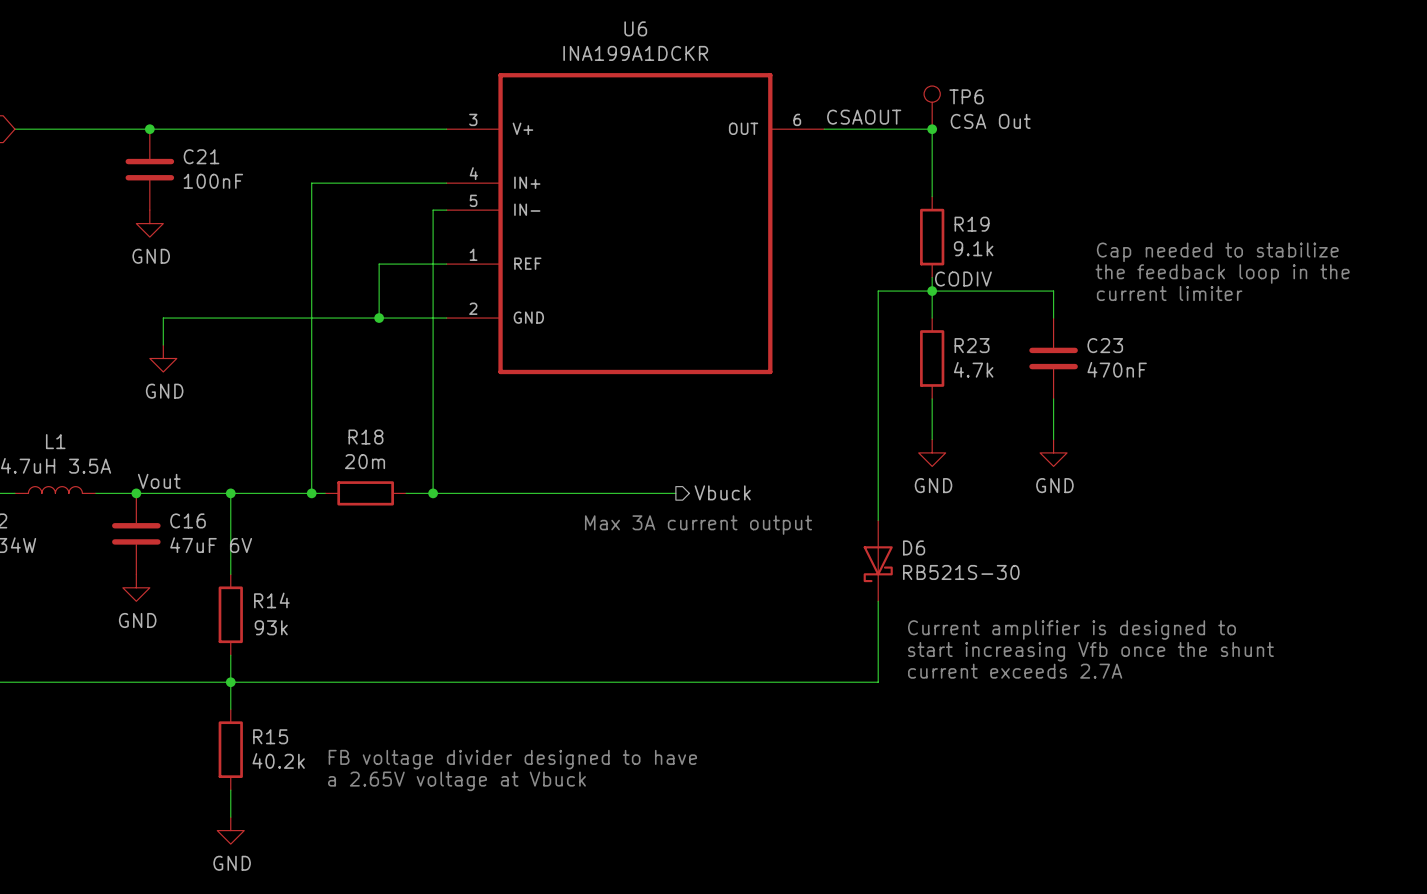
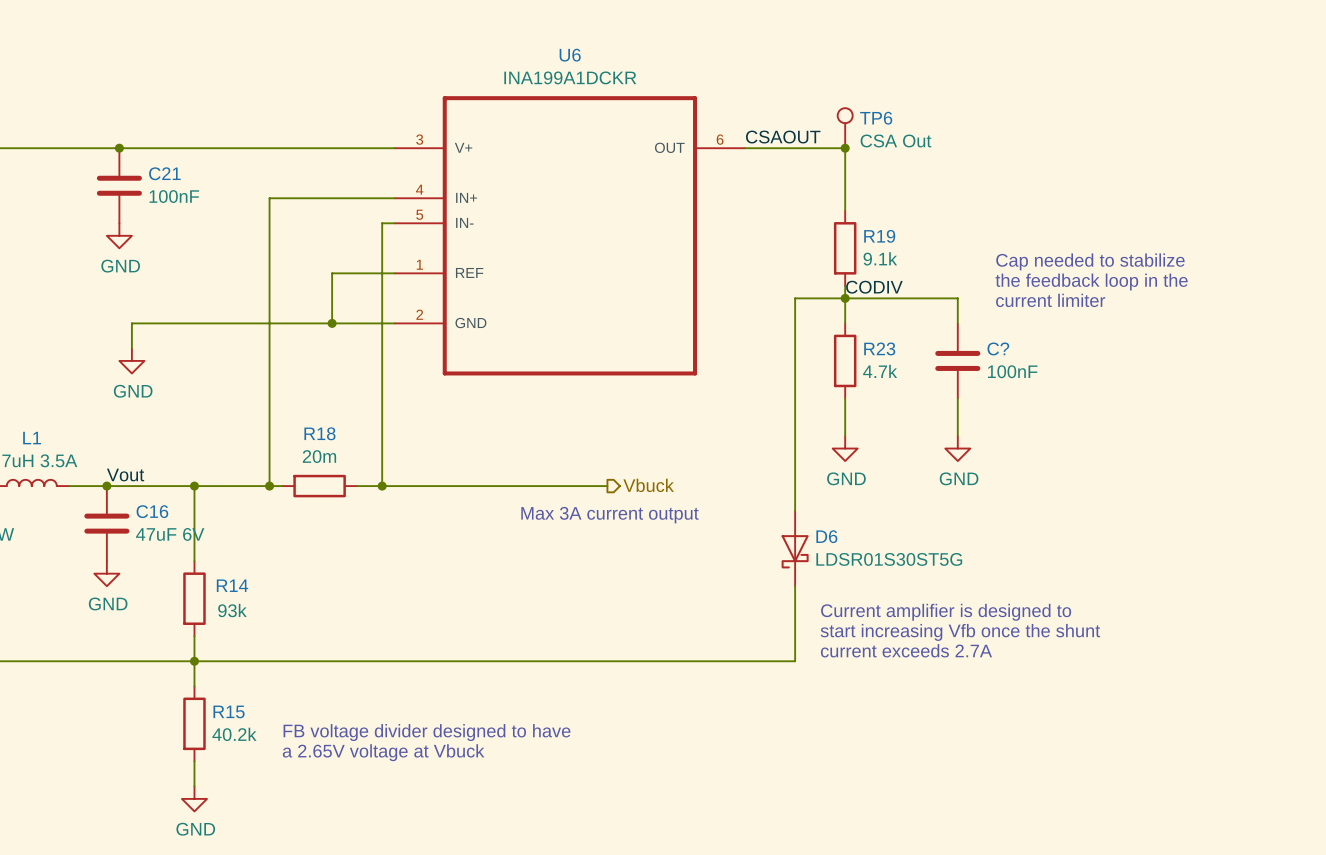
C23 name: C23 (1105, 345) -> C? (998, 348)
C23 value: 470nF (1117, 369) -> 100nF (1012, 371)
D6 value: RB521S-30 (961, 572) -> LDSR01S30ST5G (889, 559)

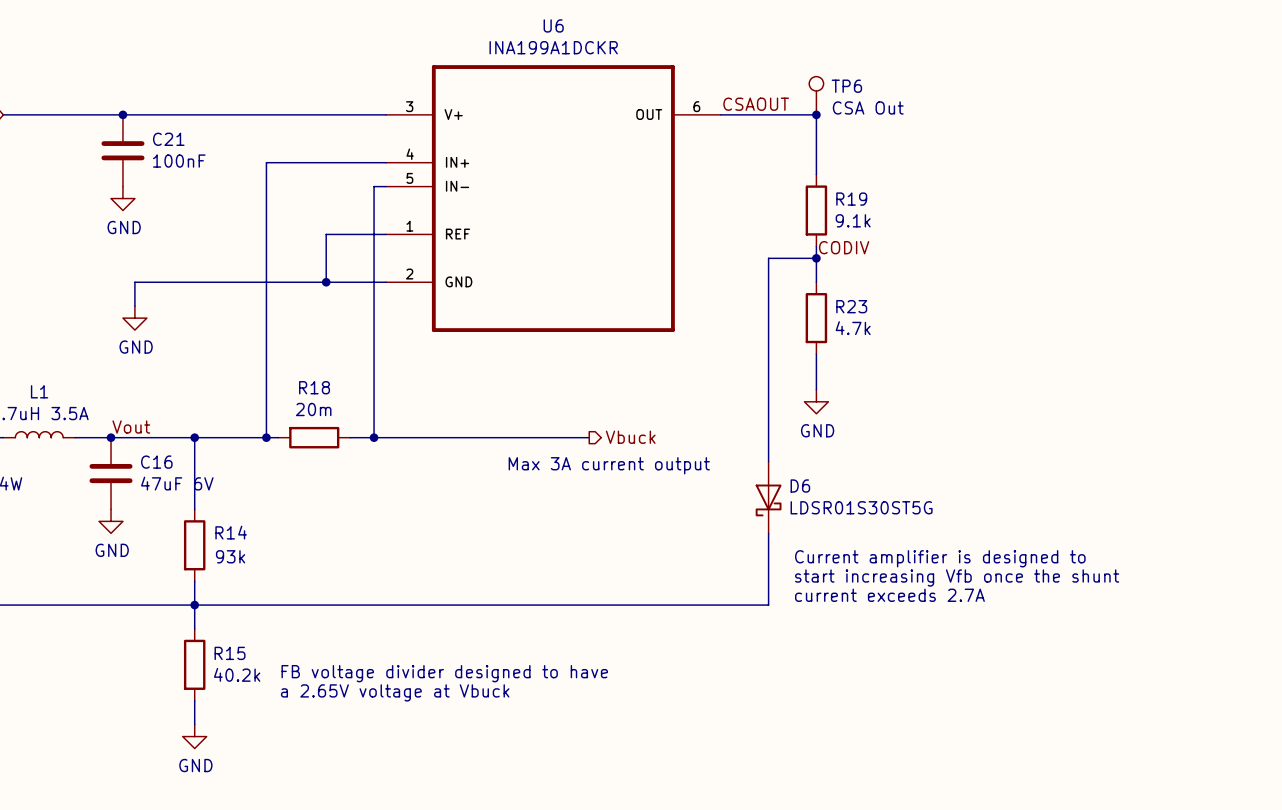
text: Cap needed to stabilize (1090, 261) -> none
text: the feedback loop in the (1091, 282) -> none
wire: (845, 298) (957, 298) (957, 323) -> none
text: current limiter (1050, 300) -> none
C?: 100nF (957, 360) -> none
wire: (957, 398) (957, 436) -> none
power symbol: GND (957, 448) -> none

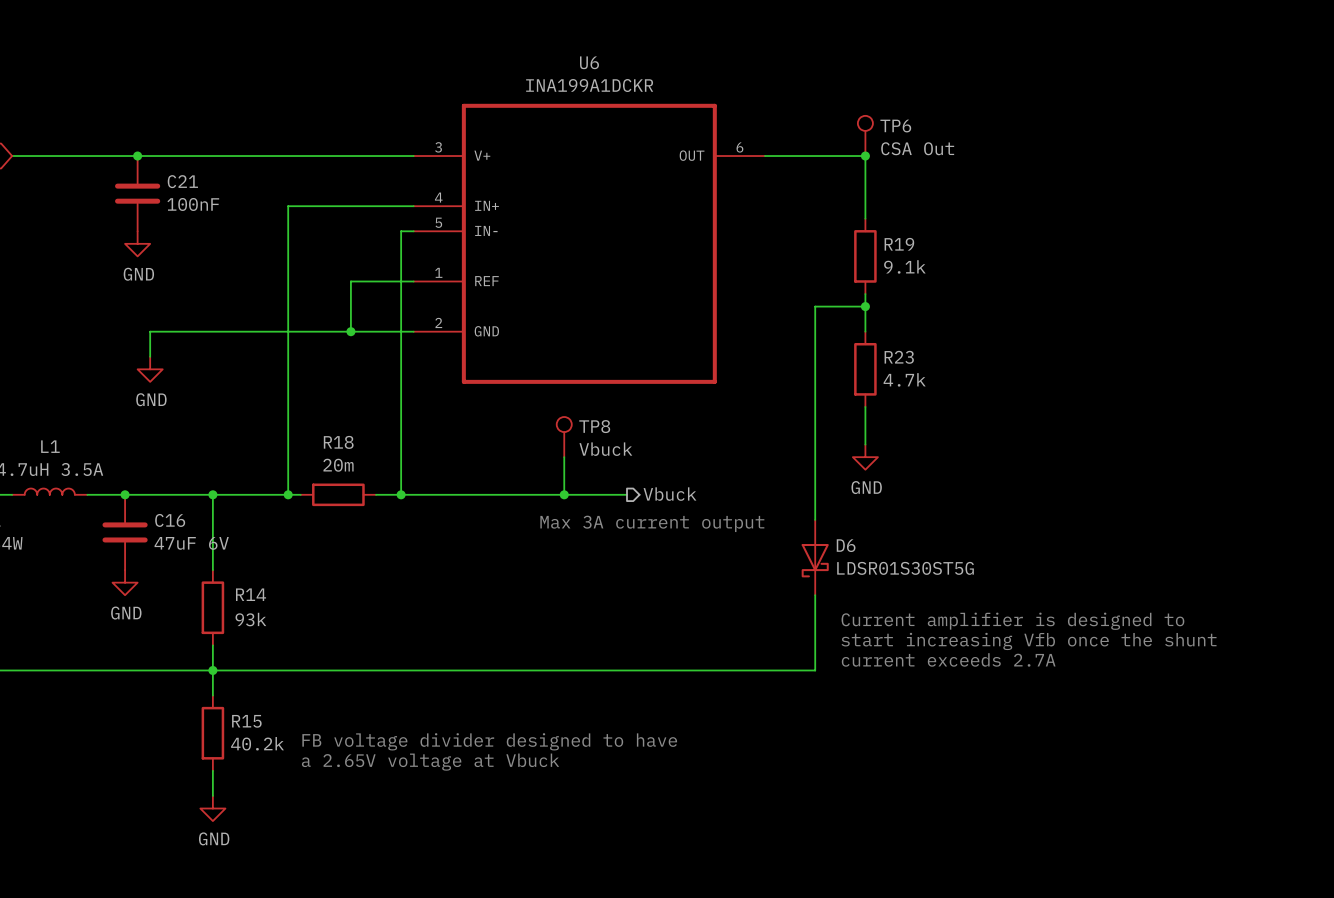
label: CSAOUT (756, 104) -> none
label: CODIV (844, 247) -> none
TP8: none -> Vbuck (564, 437)
wire: none -> (564, 457) (564, 494)
label: Vout (131, 427) -> none
junction: none -> (564, 494)

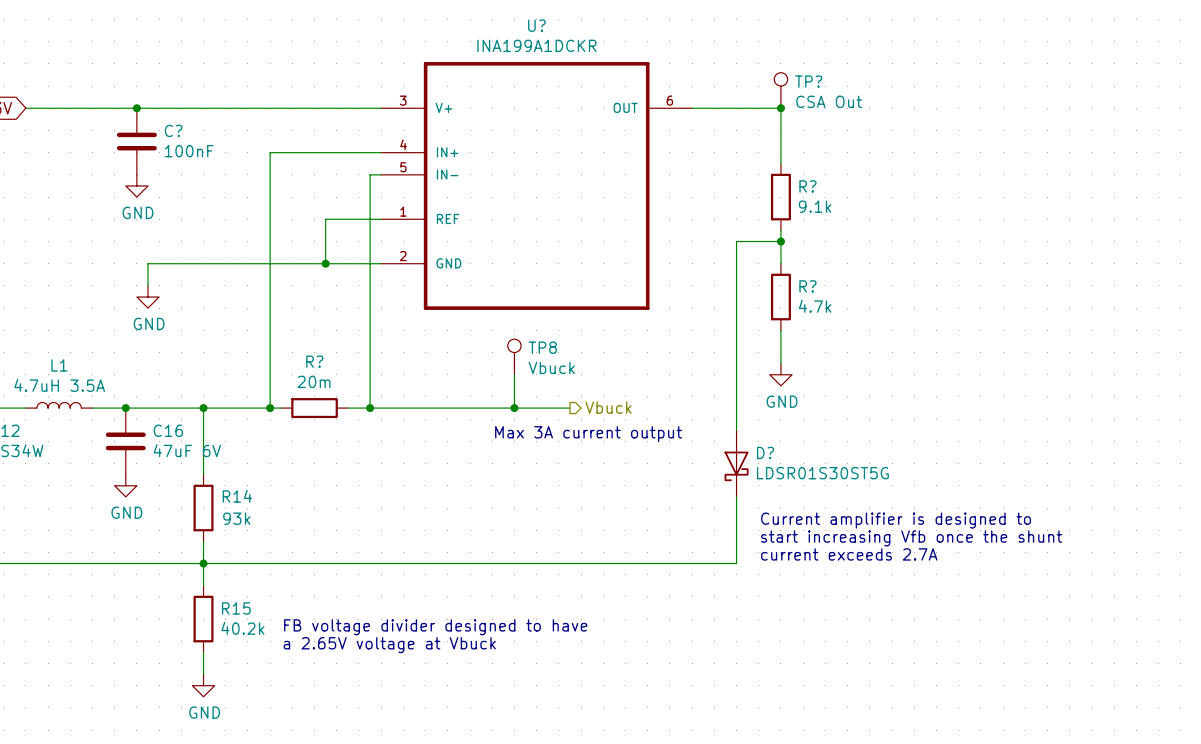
U6 name: U6 (589, 62) -> U? (536, 25)
TP6 name: TP6 (895, 126) -> TP? (808, 81)
C21 name: C21 (182, 181) -> C? (173, 130)
R19 name: R19 (899, 244) -> R? (807, 186)
R23 name: R23 (899, 357) -> R? (807, 286)
R18 name: R18 (338, 442) -> R? (314, 361)
D6 name: D6 (846, 545) -> D? (765, 452)

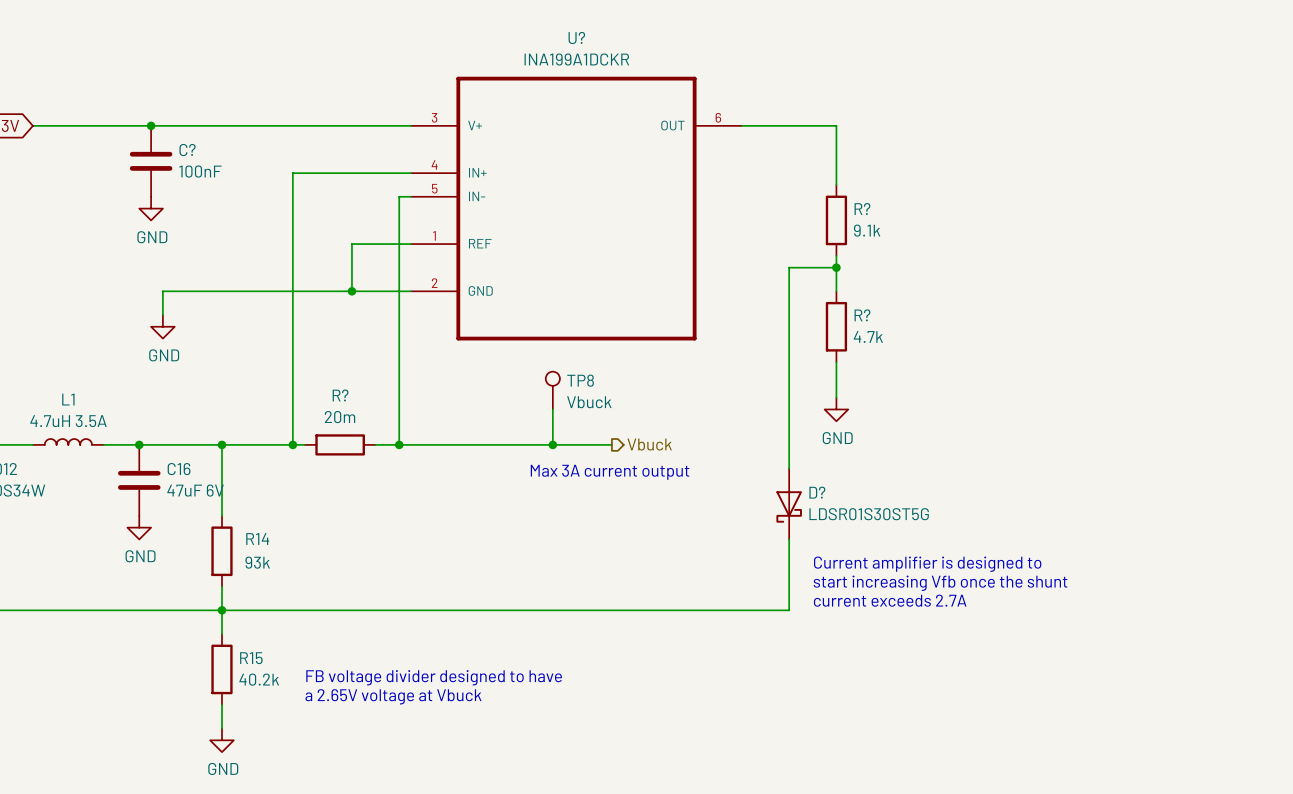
TP?: CSA Out (780, 90) -> none
junction: (780, 108) -> none

